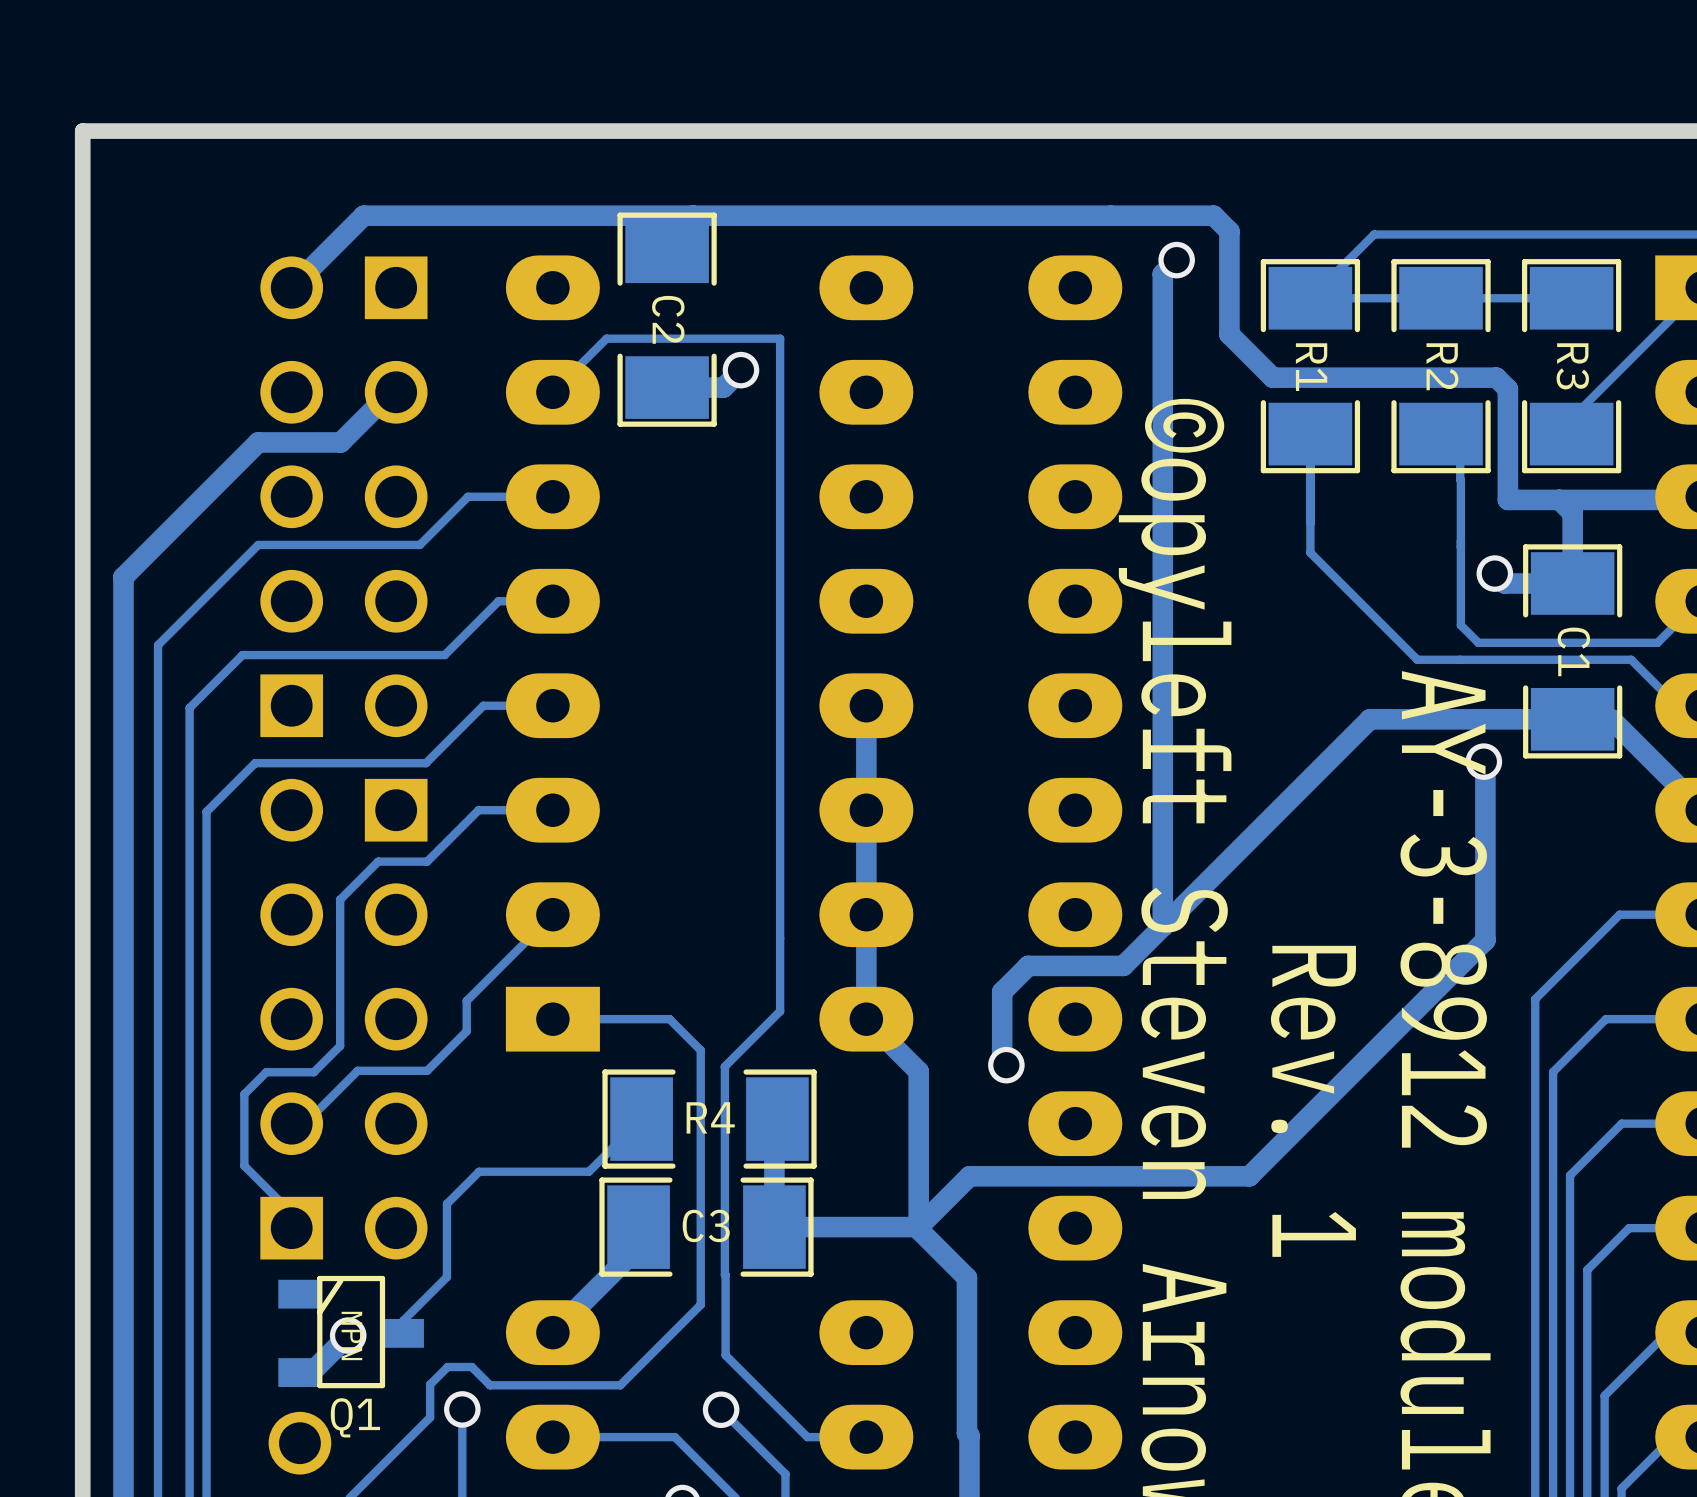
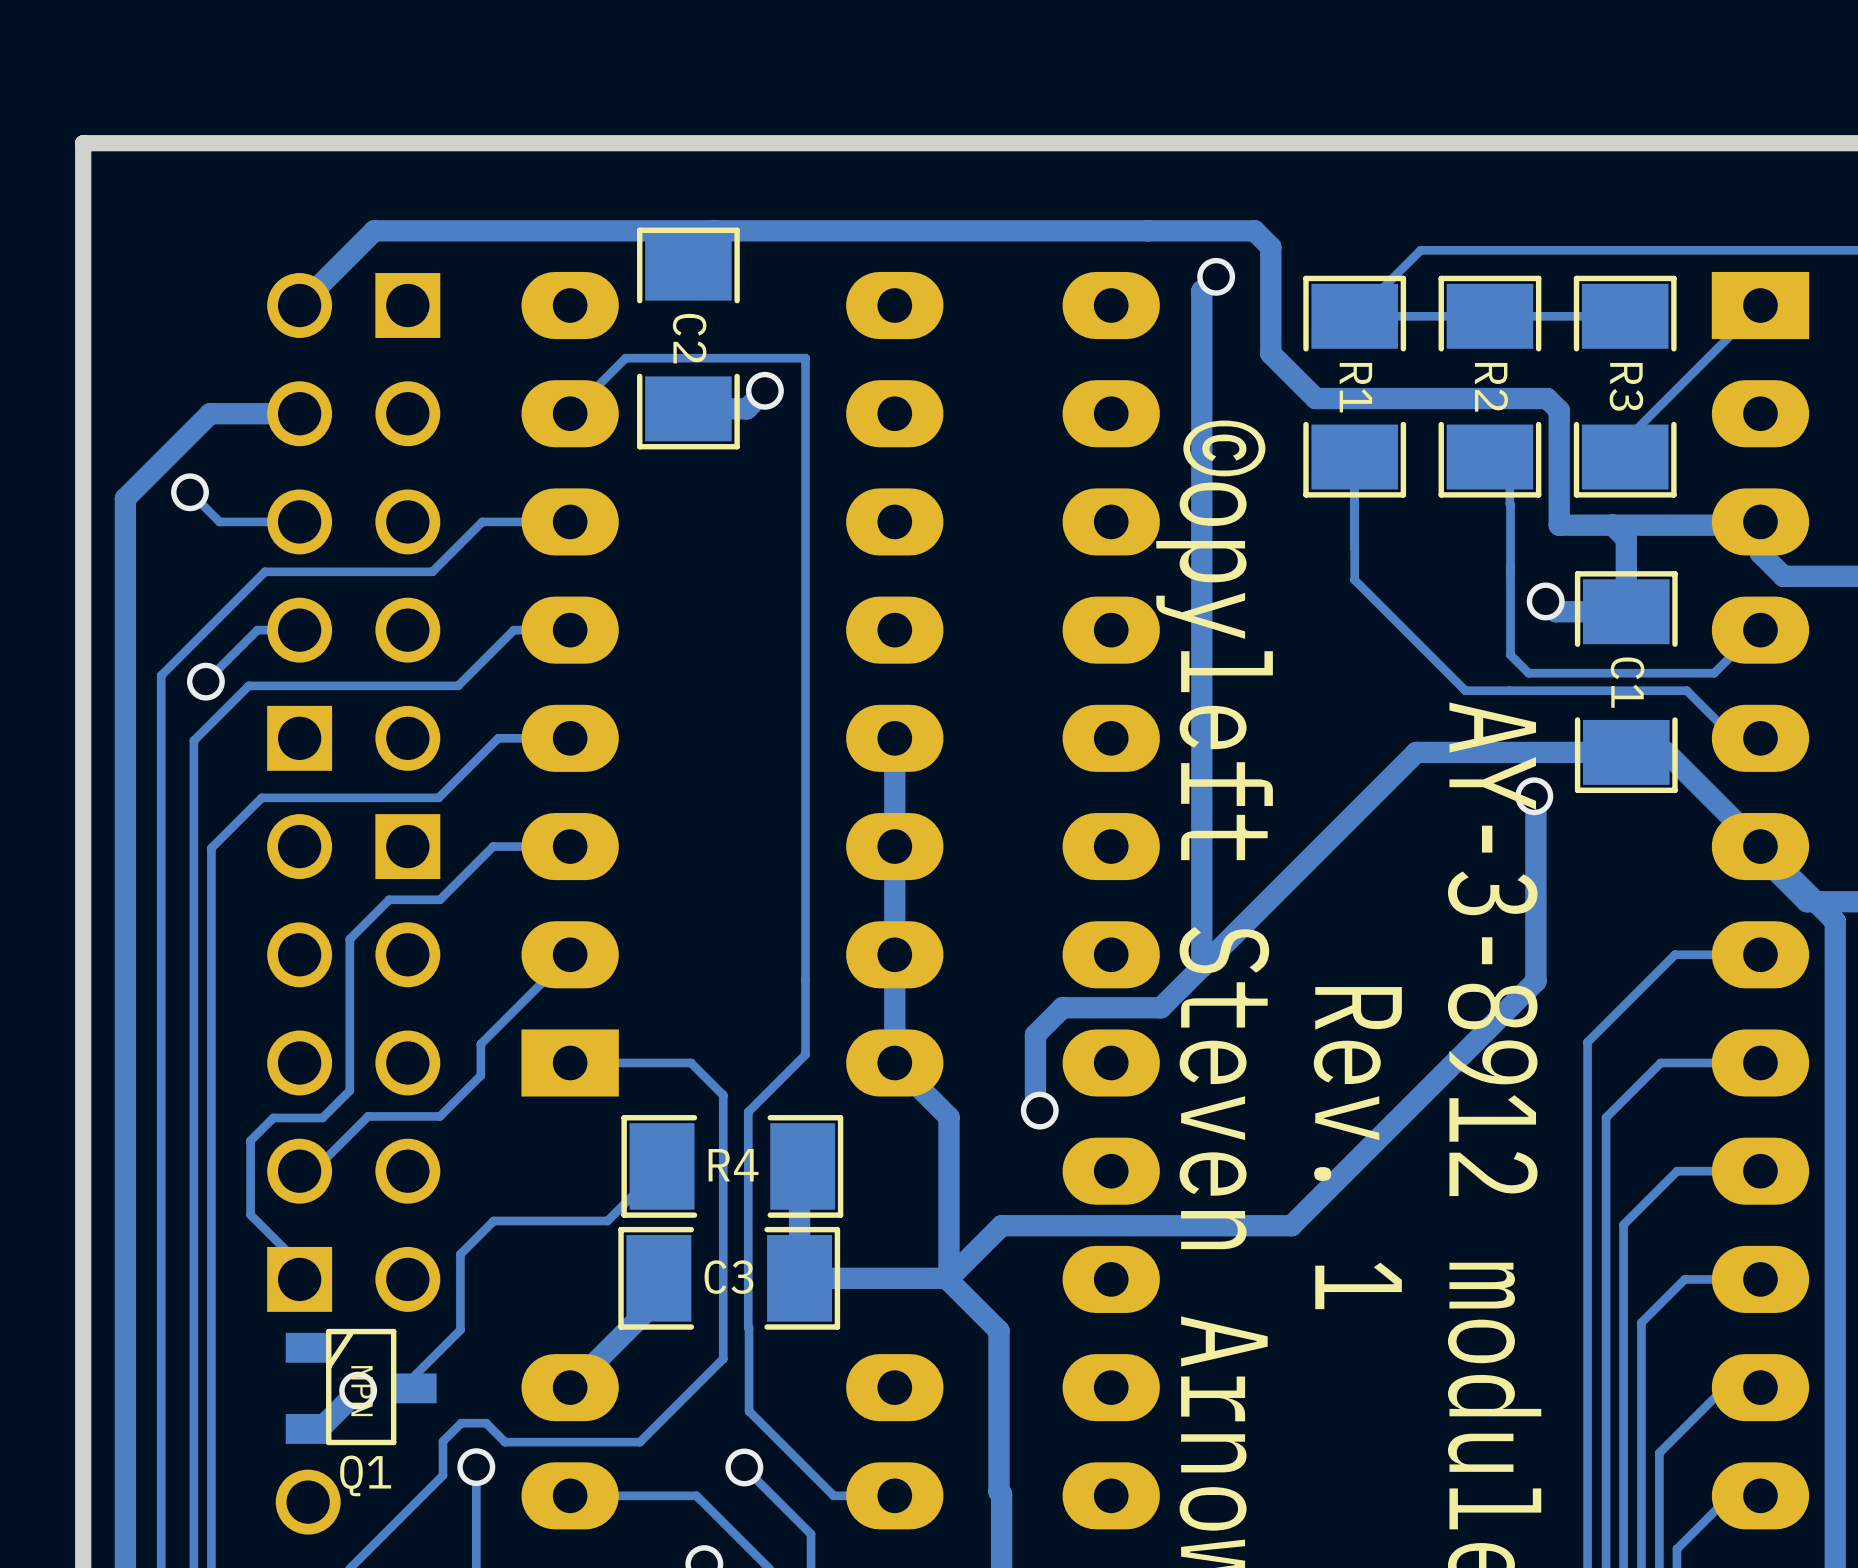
track: (396, 392) (390, 392) (340, 442) (258, 442) (123, 577) -> (299, 413) (210, 413) (125, 498) (125, 605)
track: none -> (190, 492) (219, 521) (299, 521)
via: none -> (190, 492)
track: none -> (299, 630) (257, 630) (205, 681)
via: none -> (205, 681)

